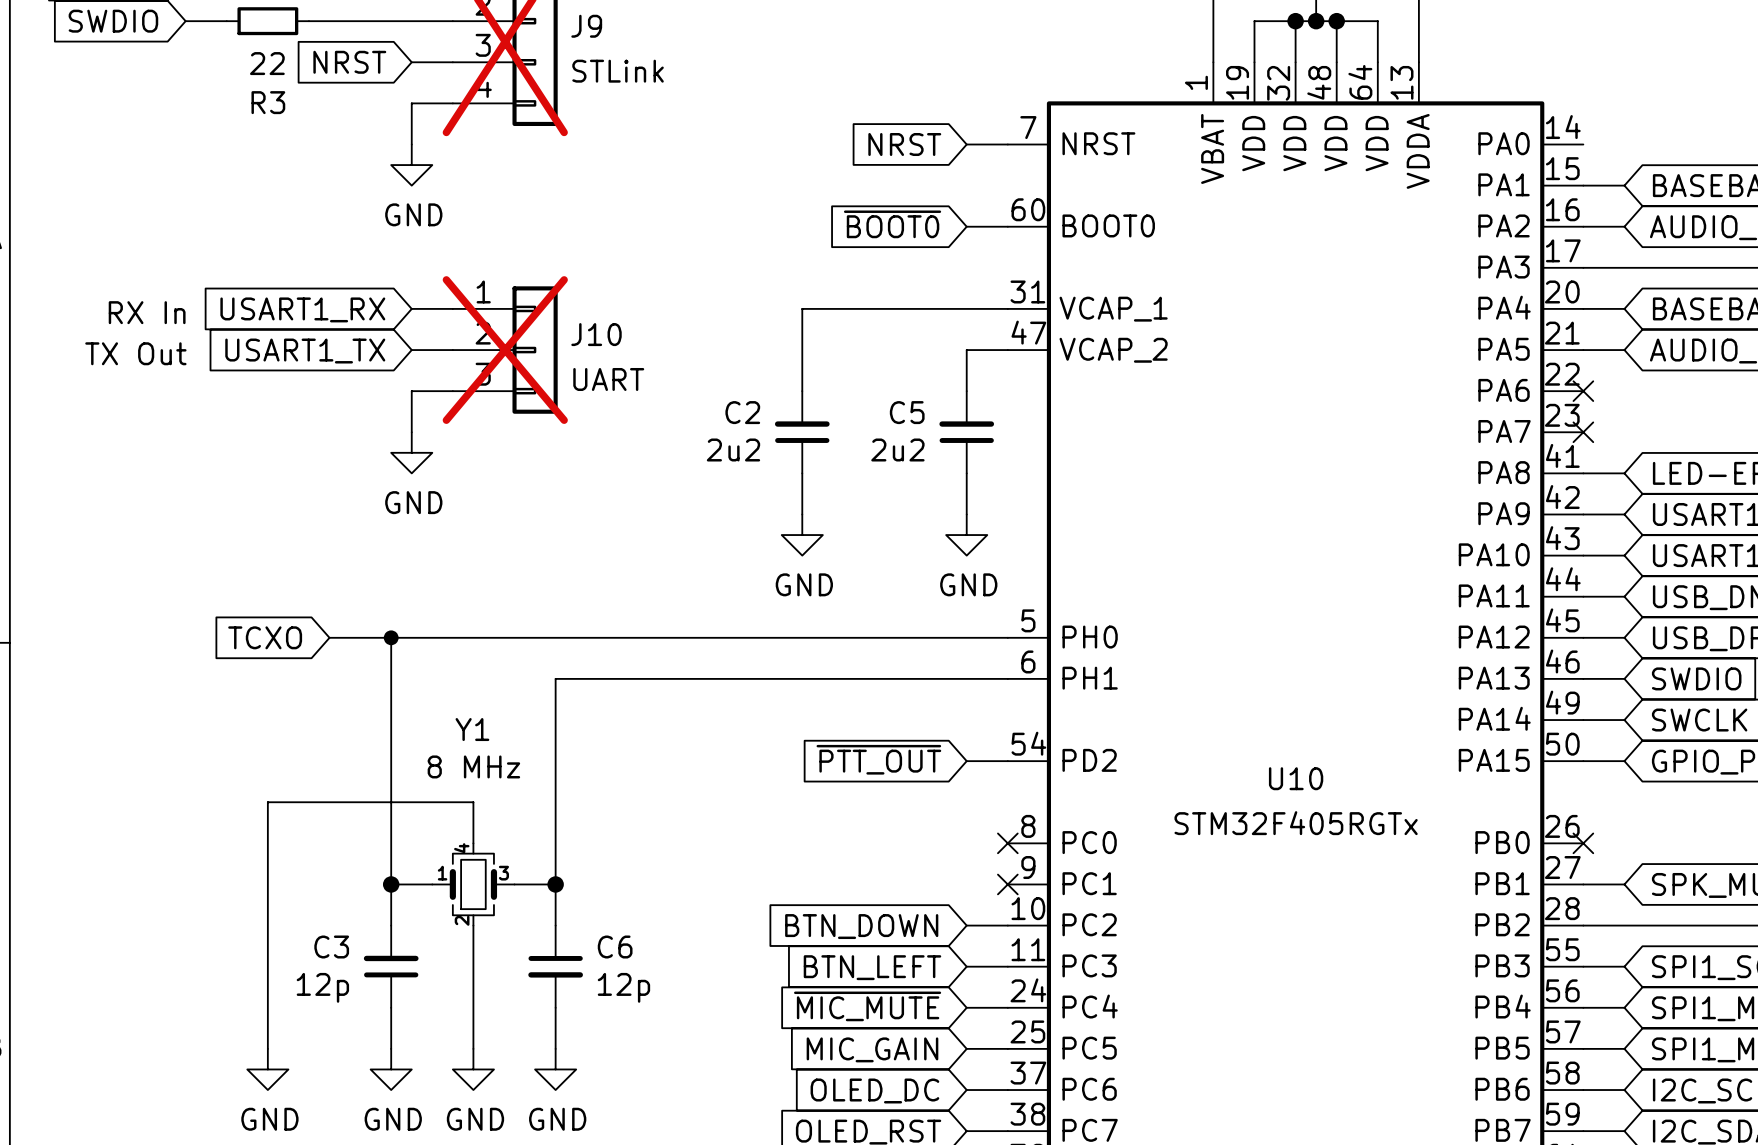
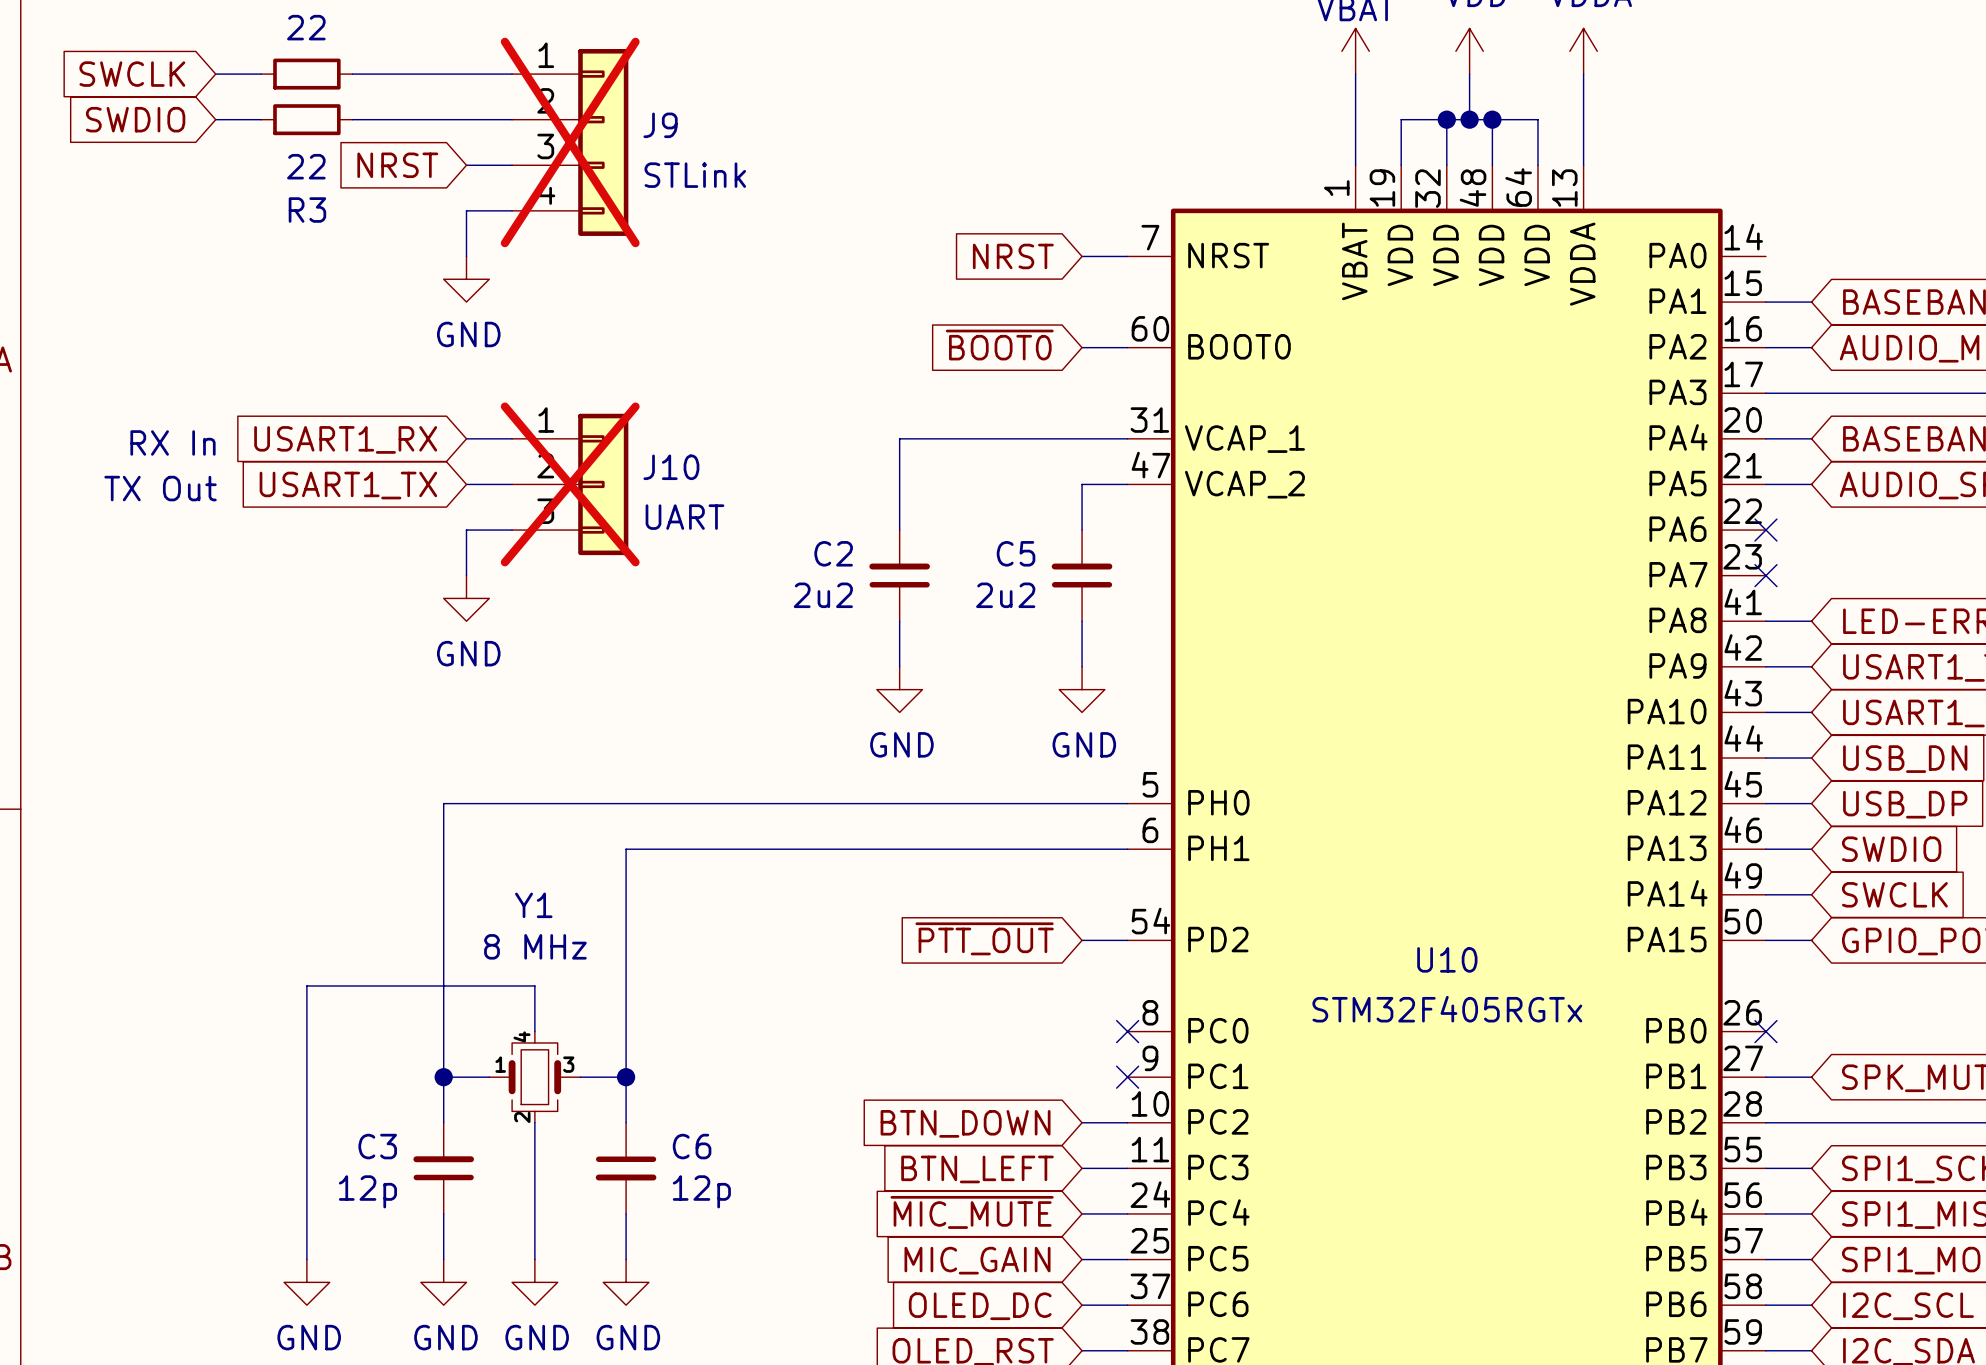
global label: TCXO (265, 637) -> none
wire: (329, 637) (391, 637) -> none
junction: (391, 637) -> none

